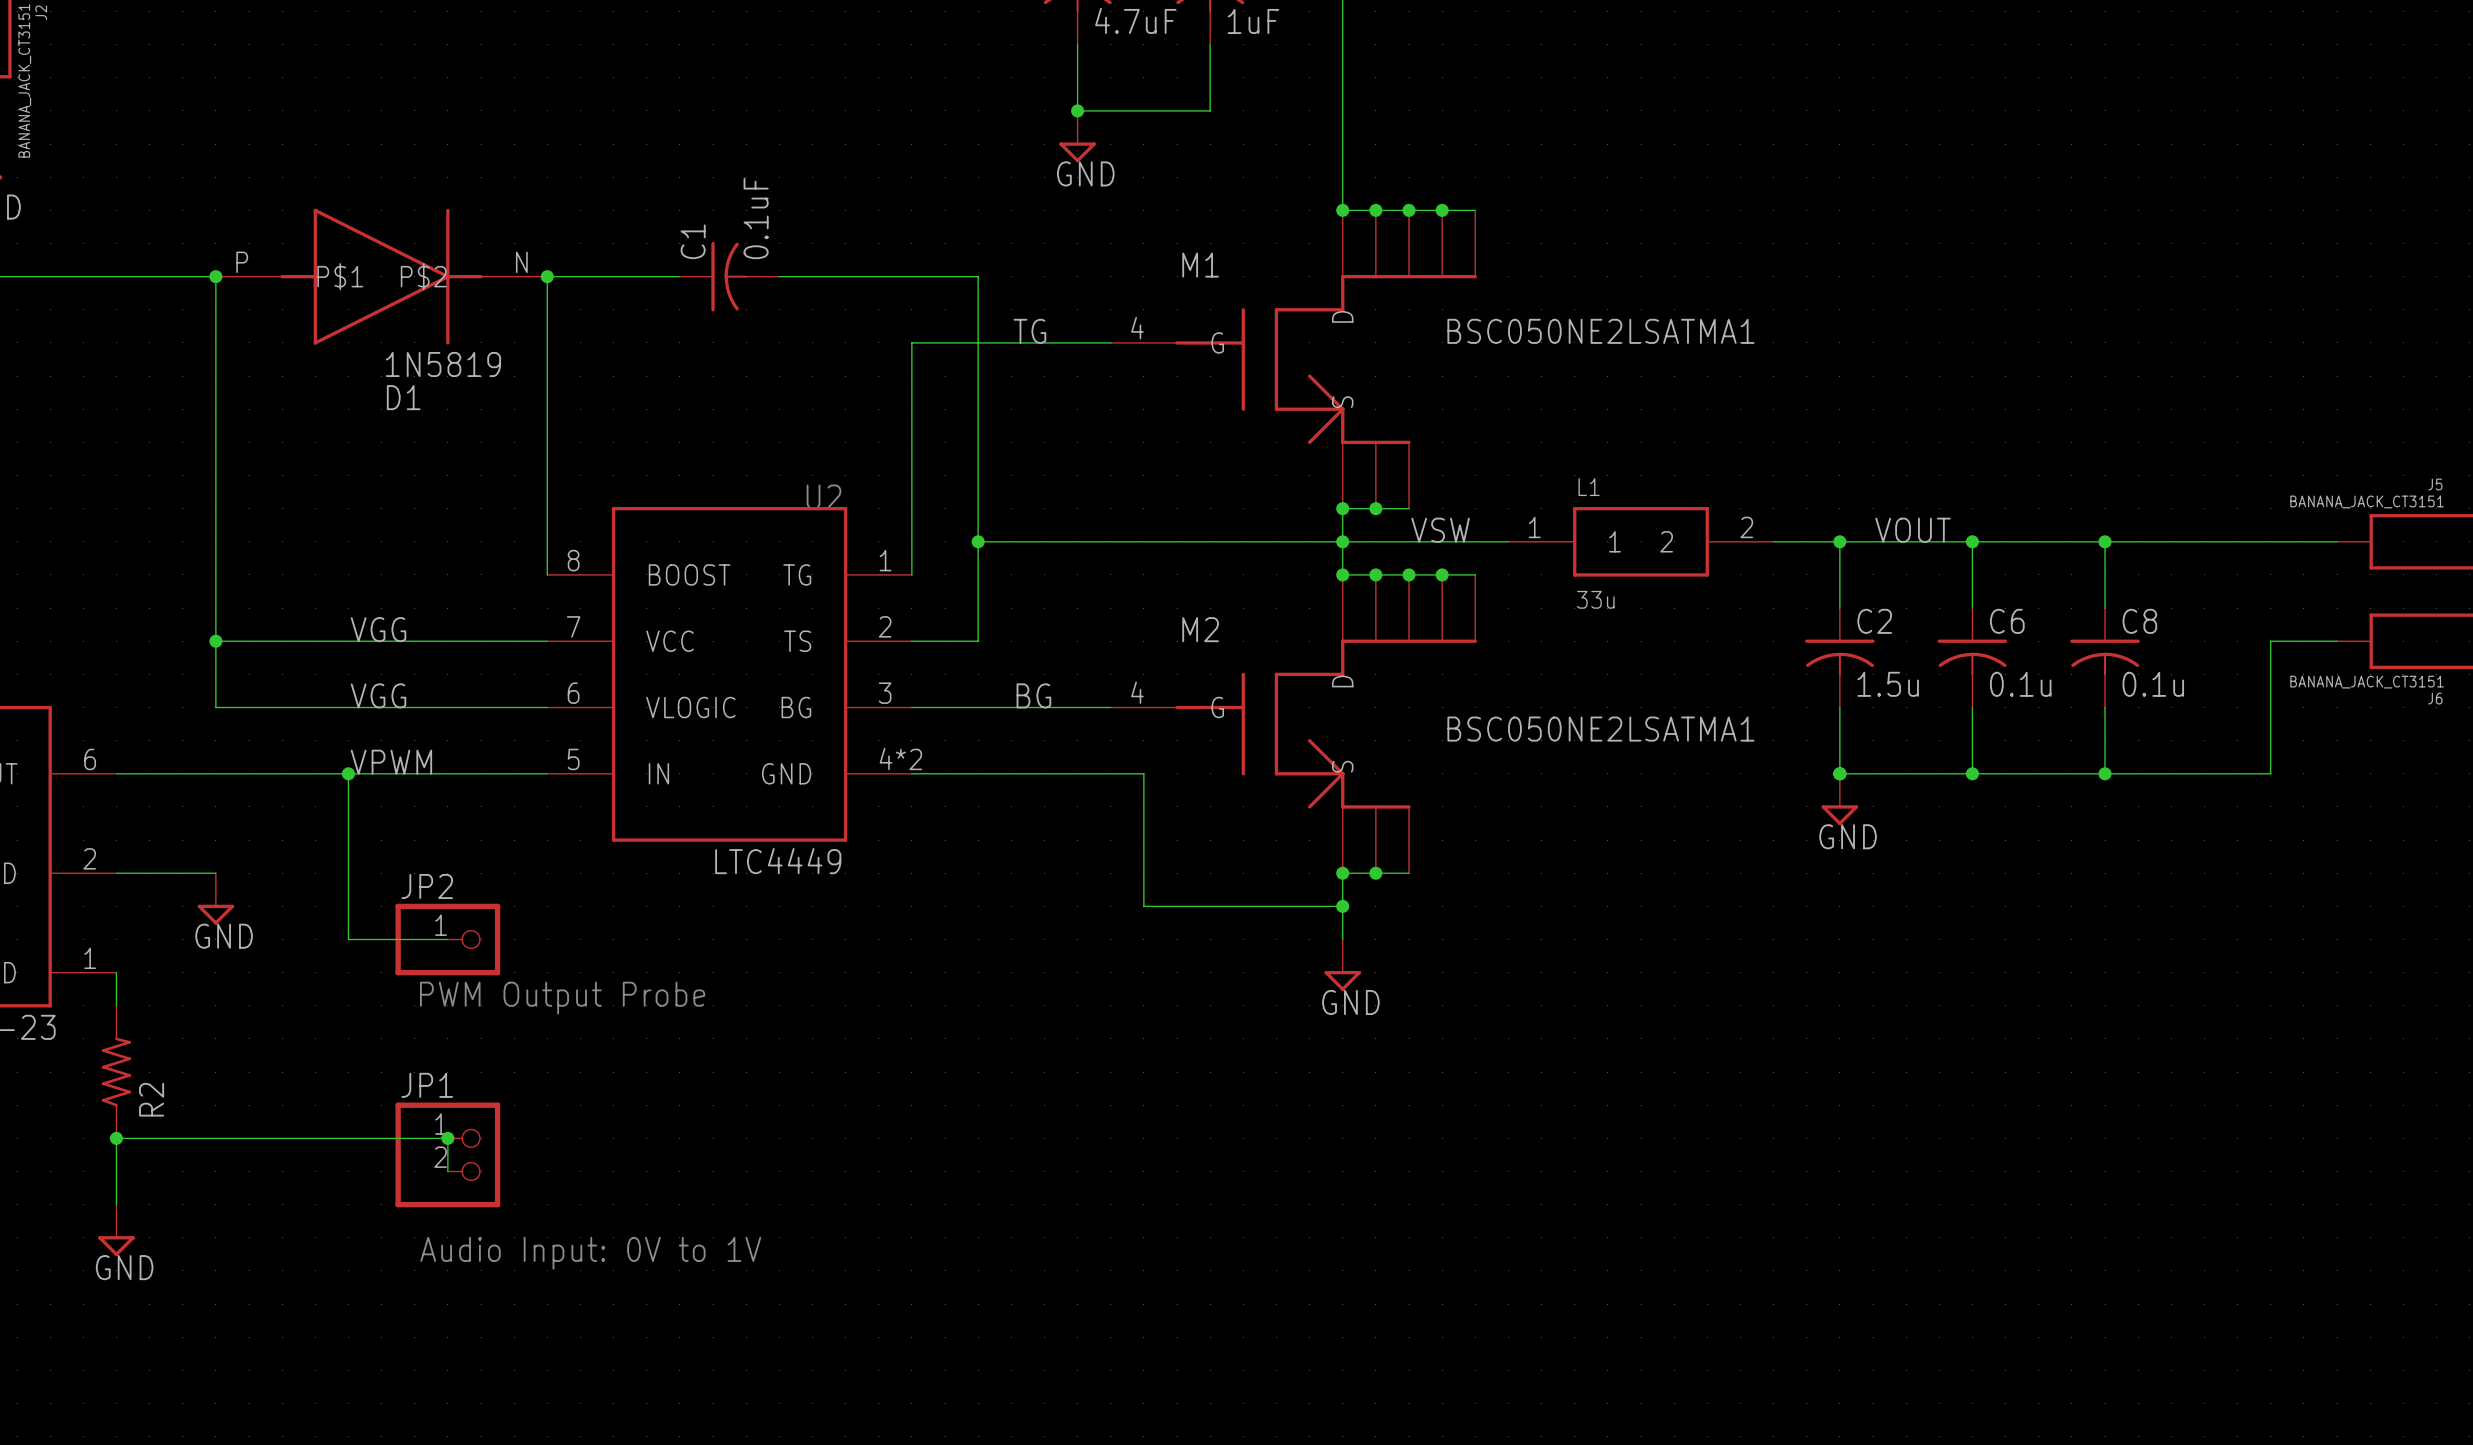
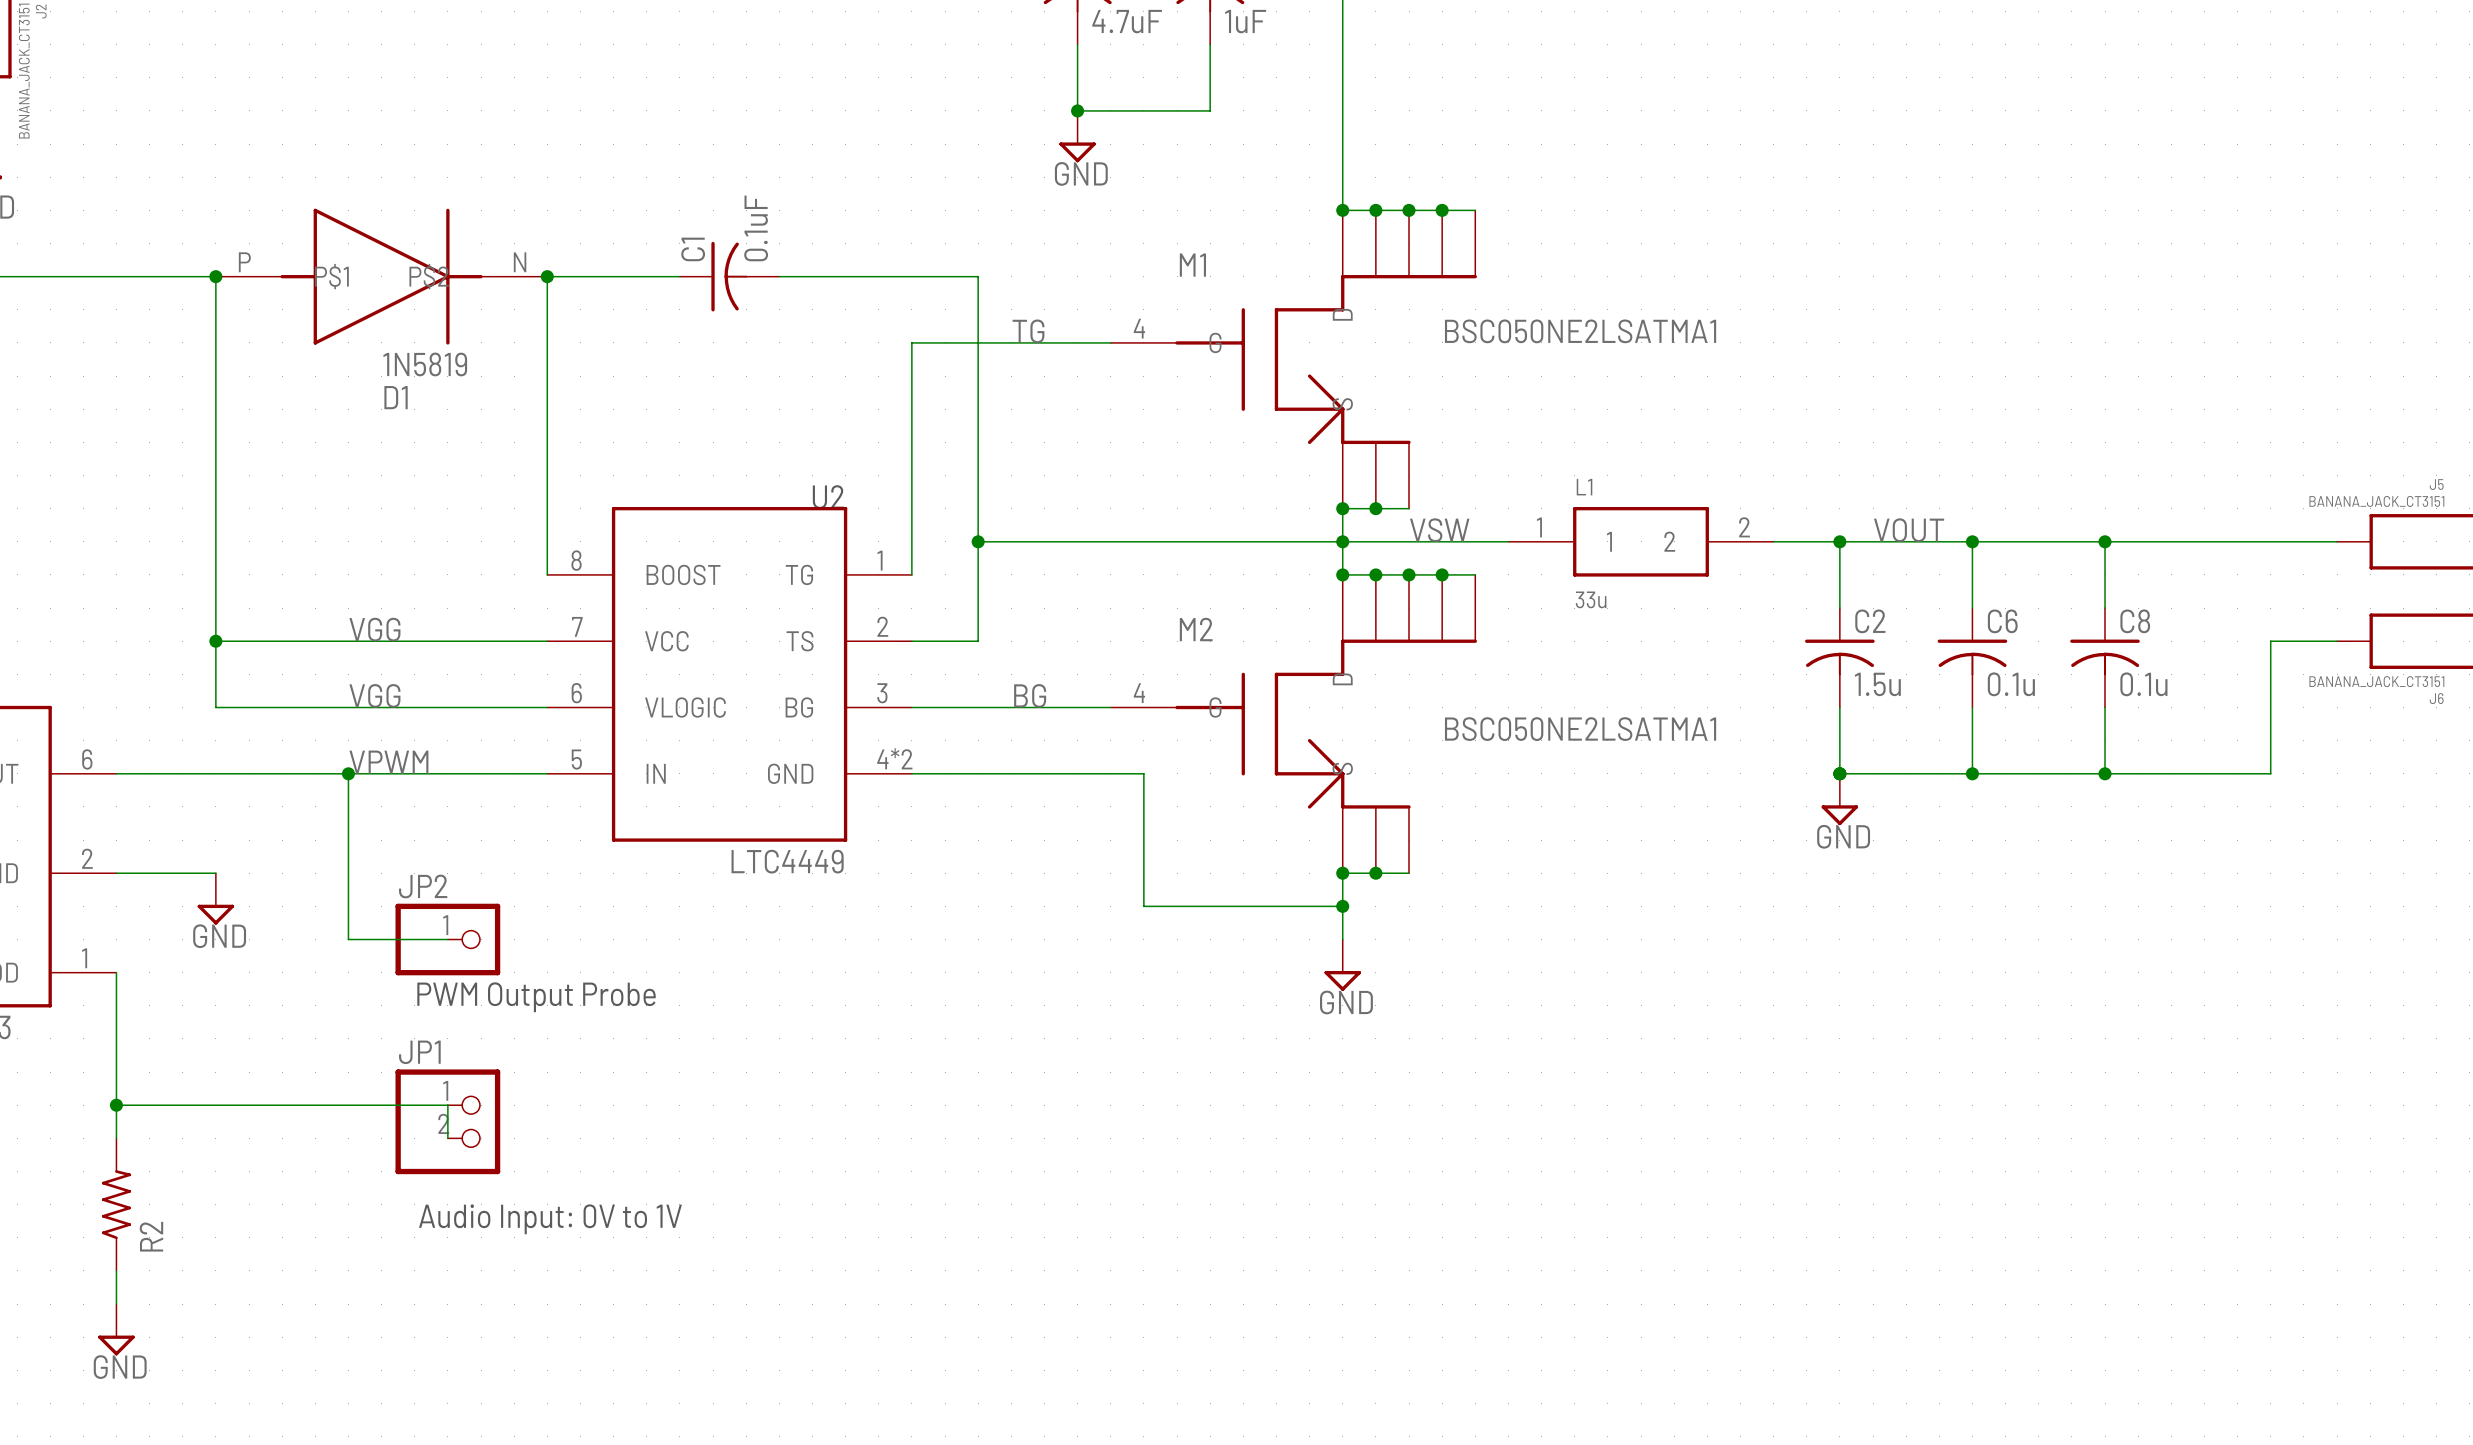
R2 position: (116, 1072) -> (116, 1204)
wire: none -> (116, 1105) (447, 1105) (447, 1138)
junction position: (116, 1138) -> (116, 1105)
junction: (447, 1138) -> none
JP1 position: (447, 1154) -> (447, 1121)
wire: (447, 1171) (447, 1138) (116, 1138) (116, 1204) -> none
power symbol position: GND (116, 1230) -> GND (116, 1329)
text position: Audio Input: 0V to 1V (590, 1253) -> Audio Input: 0V to 1V (550, 1219)
wire: none -> (116, 1270) (116, 1304)

